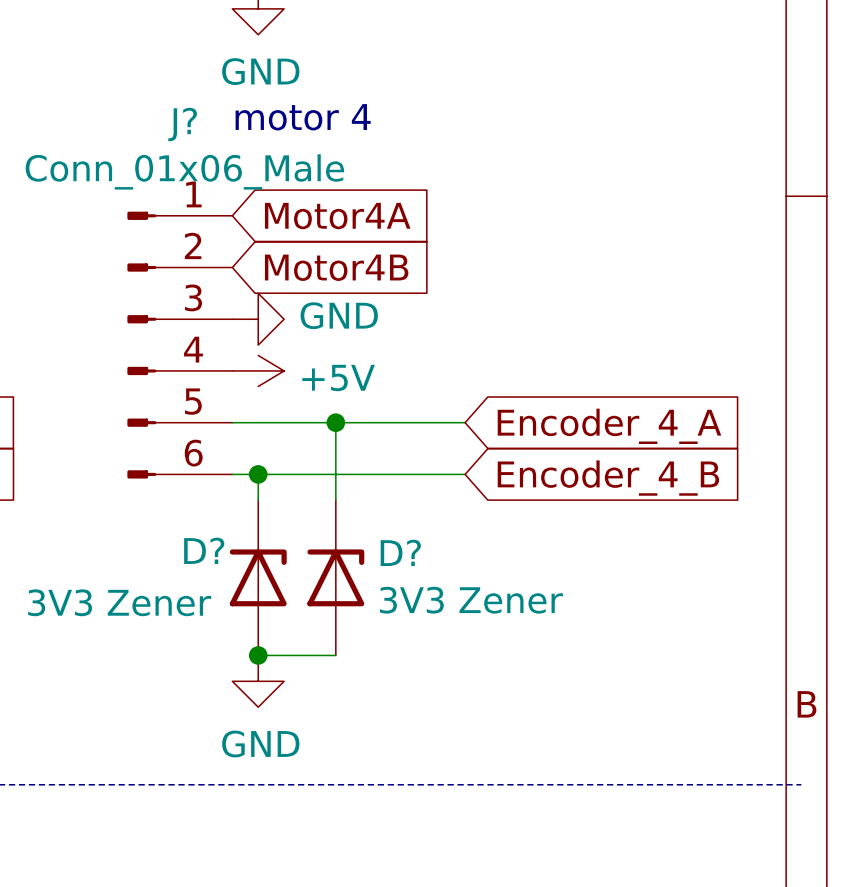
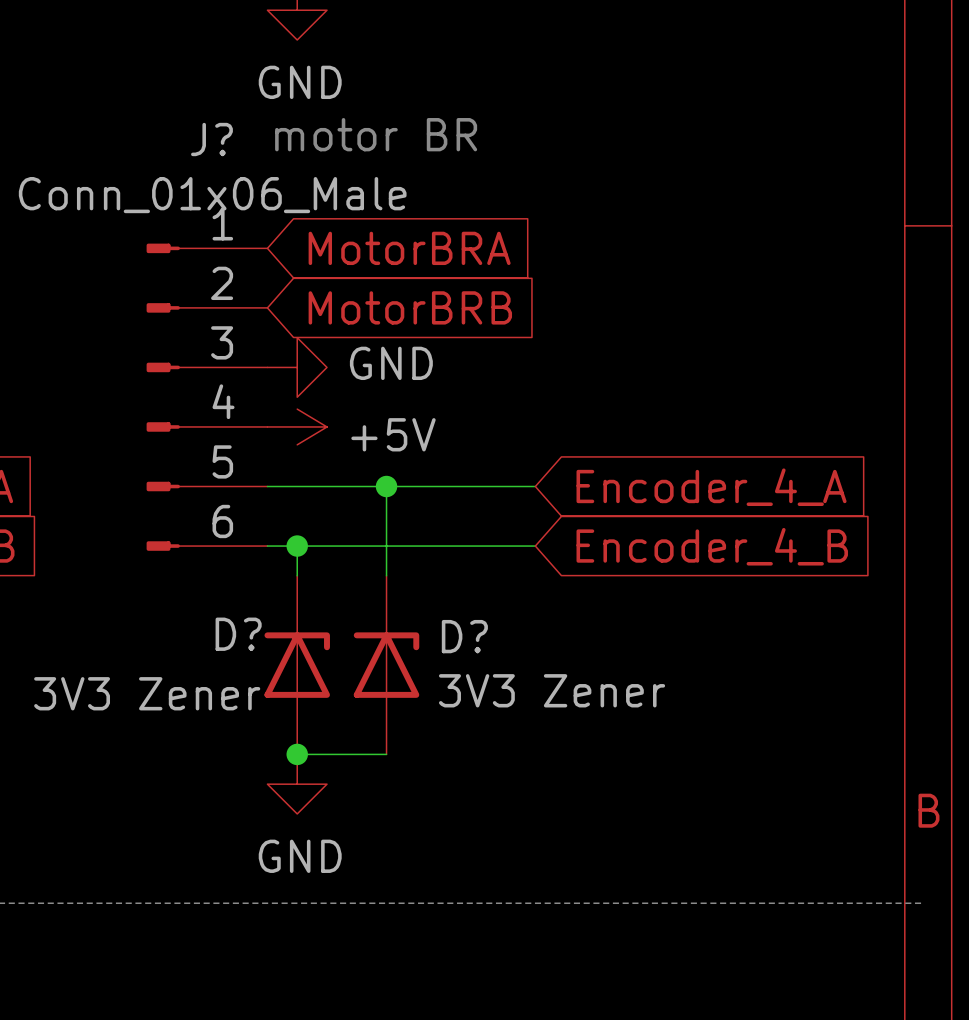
text: motor 4 (303, 117) -> motor BR (376, 134)
global label: Motor4A (337, 216) -> MotorBRA (409, 248)
global label: Motor4B (336, 267) -> MotorBRB (410, 307)

